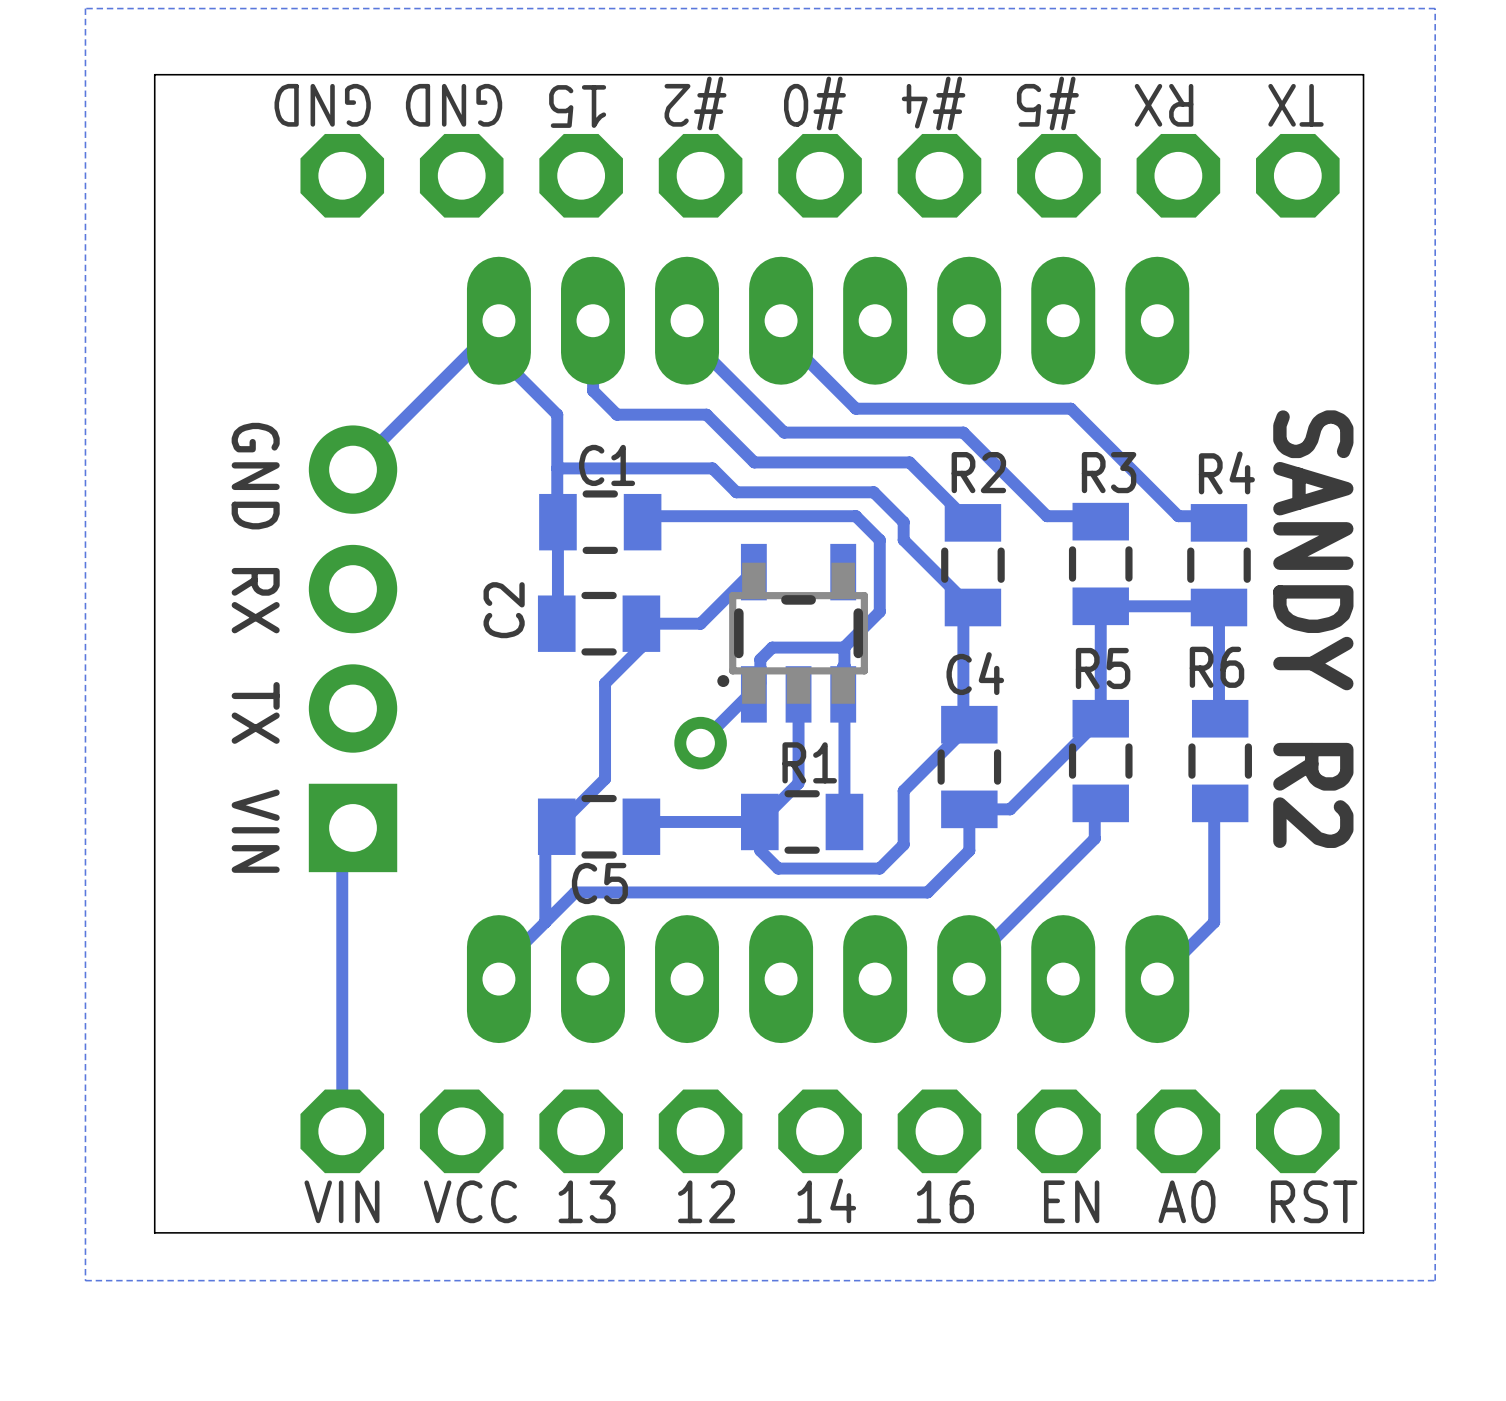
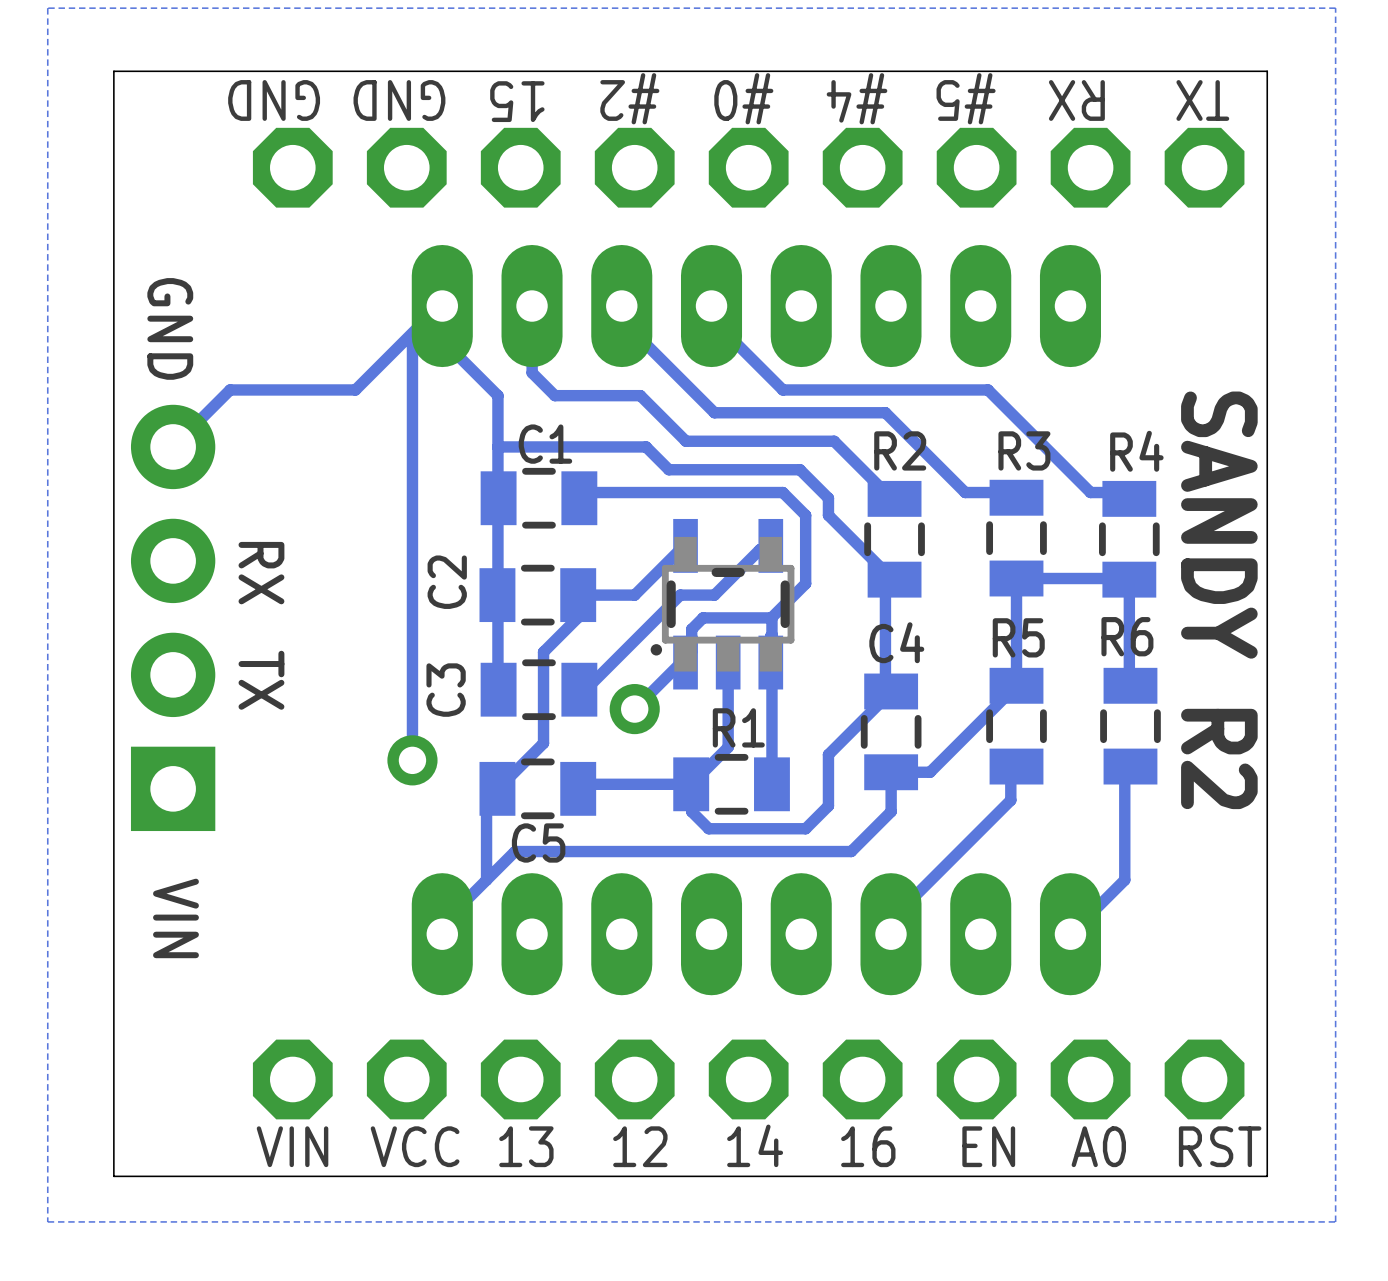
track: none -> (442, 306) (412, 335) (412, 760)
track: (491, 325) (491, 331) (353, 469) -> (435, 310) (355, 389) (230, 389) (173, 446)
text position: GND (255, 476) -> GND (170, 328)
track: (557, 522) (556, 623) -> (498, 498) (498, 689)
track: none -> (770, 545) (760, 549) (714, 595) (680, 595) (589, 686) (579, 689)
text position: RX (255, 600) -> RX (261, 573)
part position: (353, 648) -> (173, 617)
text position: TX (255, 712) -> TX (261, 680)
C3: none -> (538, 689)
via: none -> (412, 760)
track: (353, 827) (342, 838) (342, 1131) -> none
text position: VIN (255, 831) -> VIN (175, 918)

